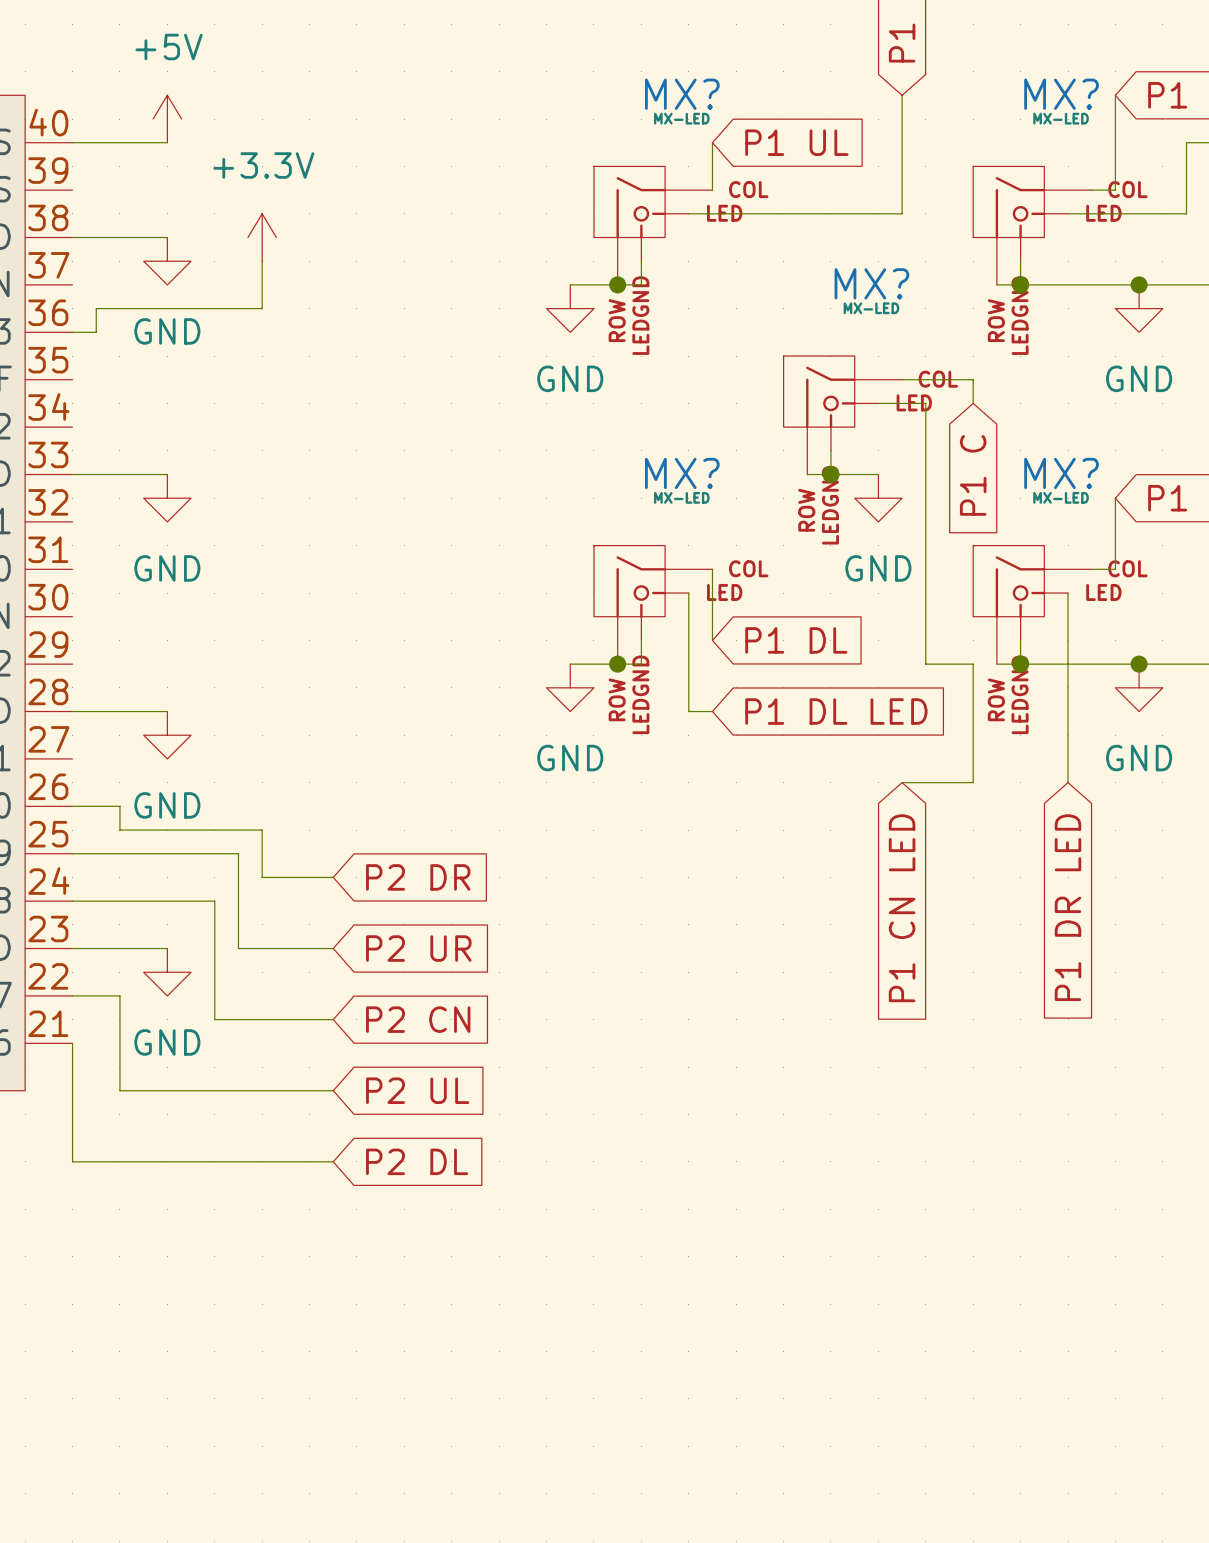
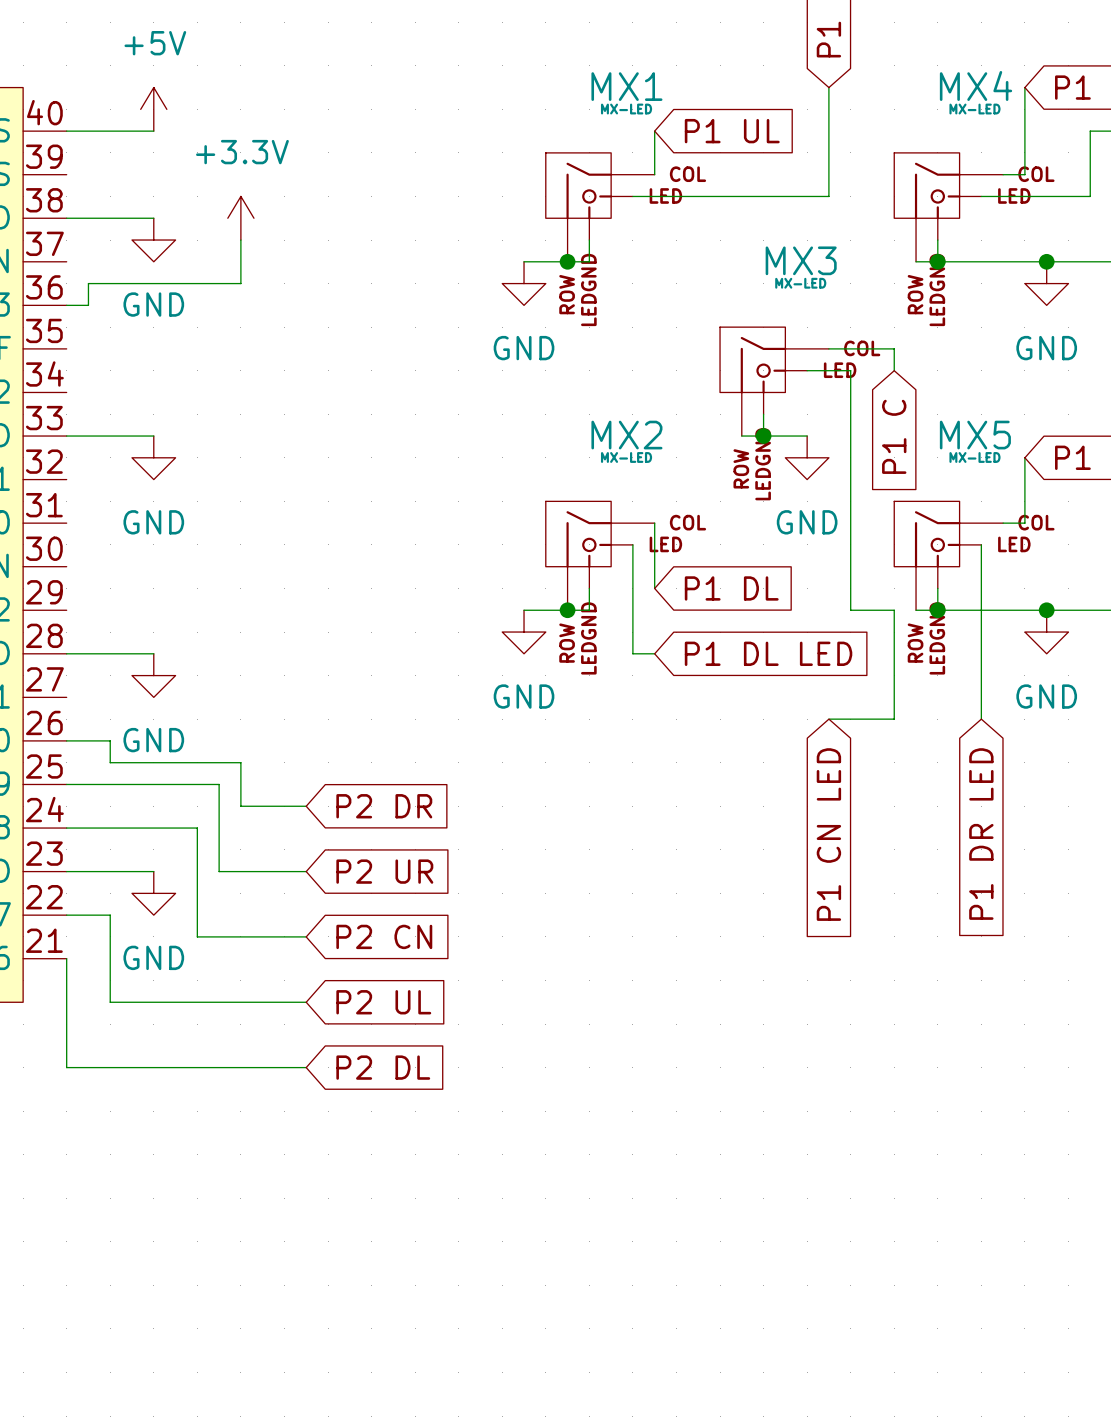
MX? name: MX? (682, 94) -> MX1 (626, 86)
MX? name: MX? (1061, 94) -> MX4 (976, 85)
MX? name: MX? (871, 283) -> MX3 (801, 260)
MX? name: MX? (682, 473) -> MX2 (626, 435)
MX? name: MX? (1061, 473) -> MX5 (975, 435)

